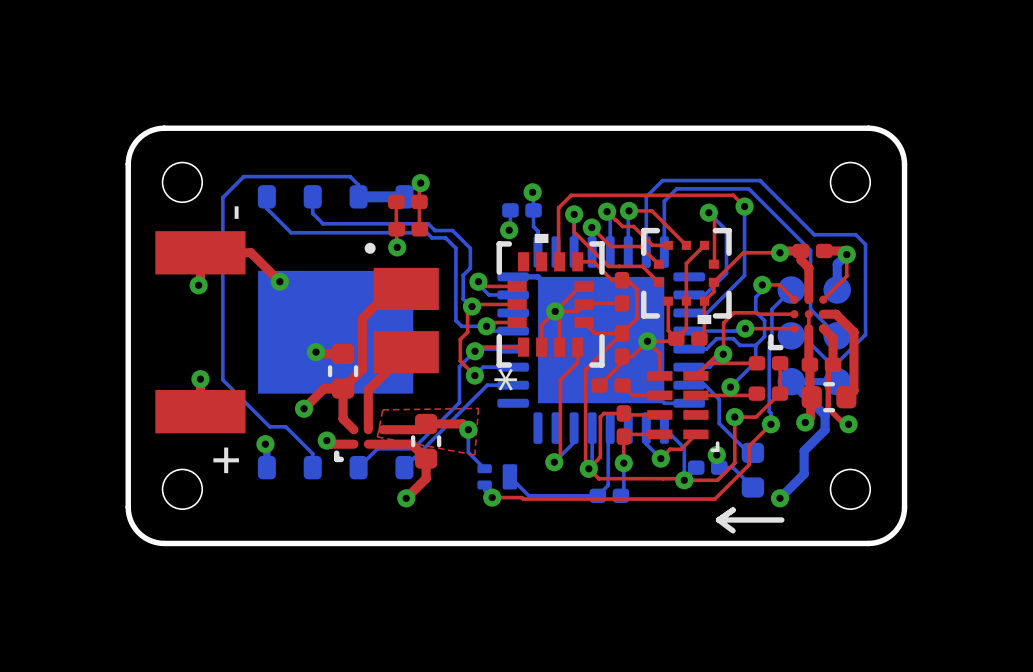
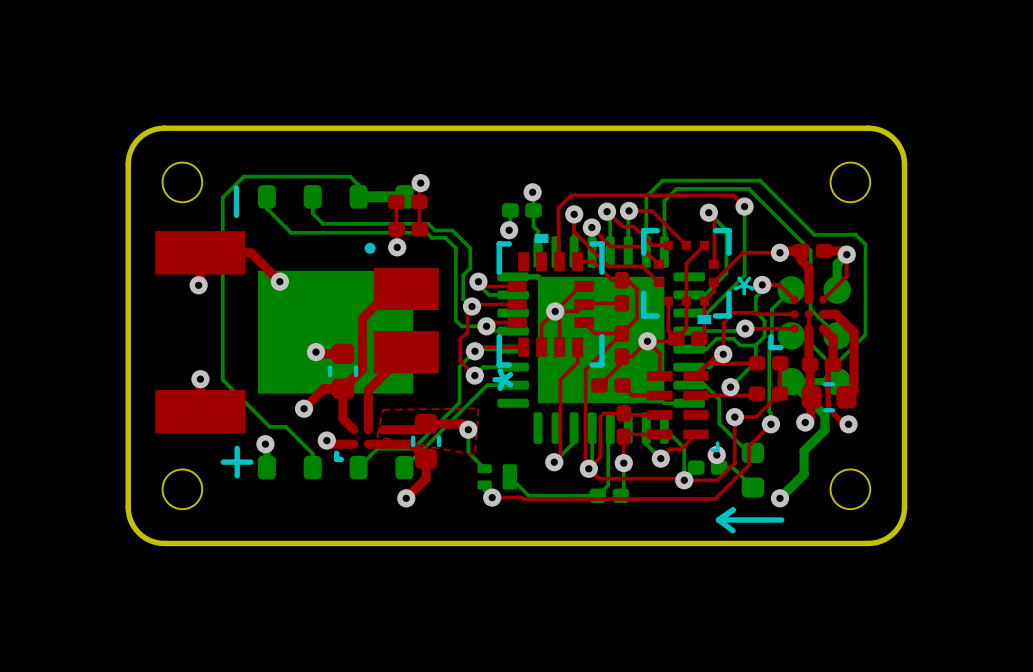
part text: none -> * (744, 286)

